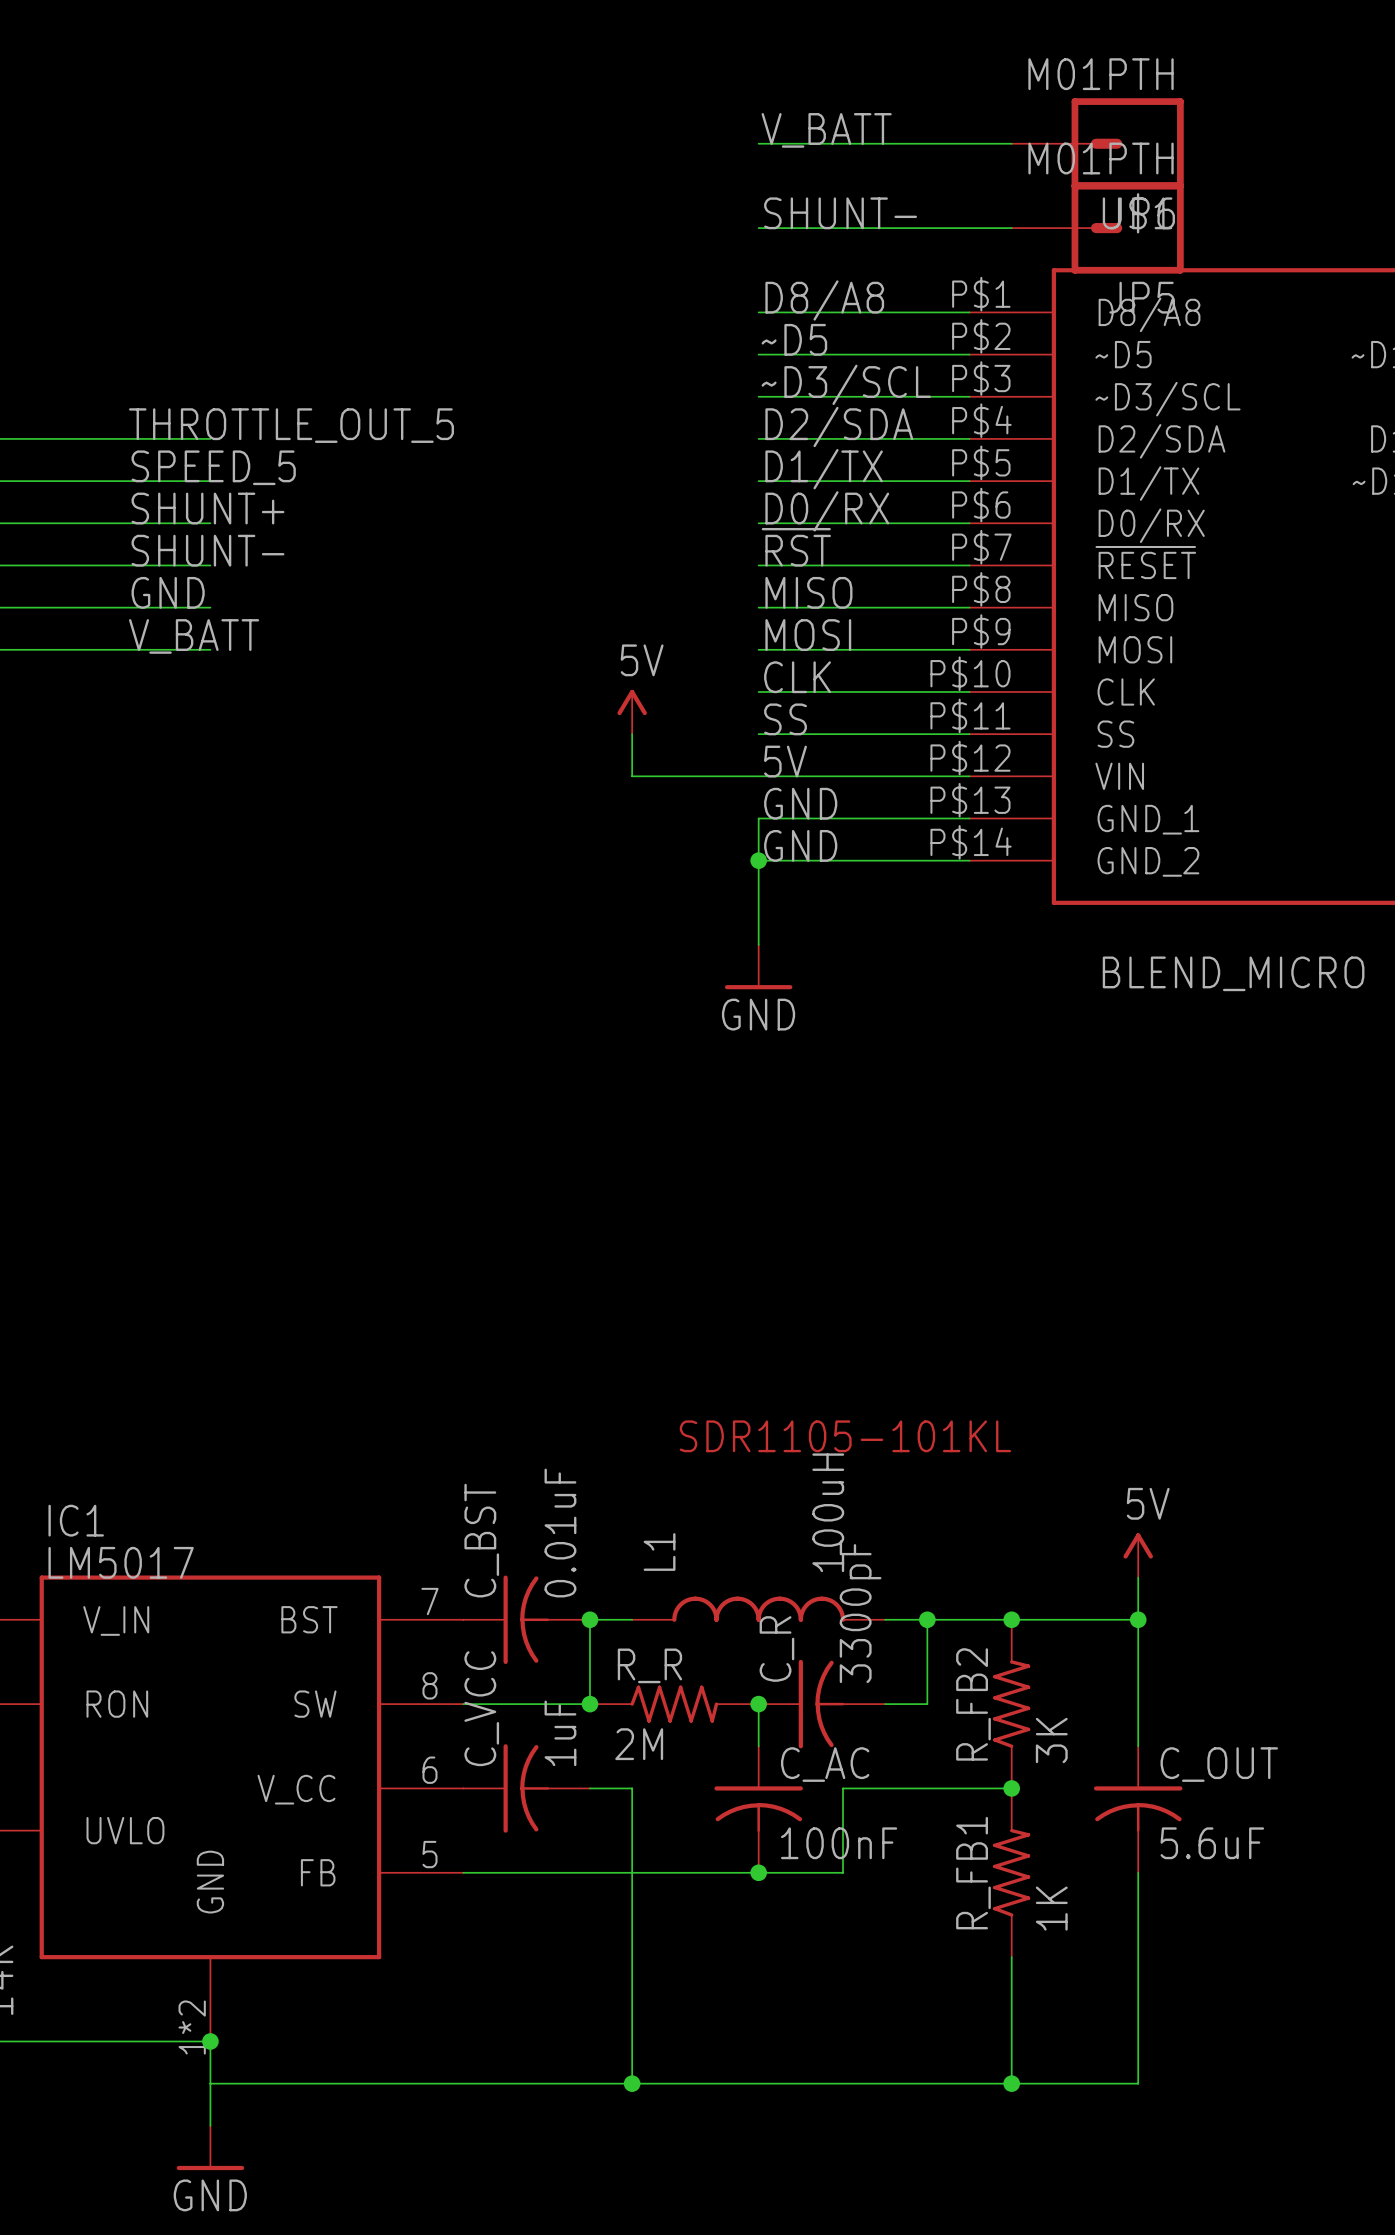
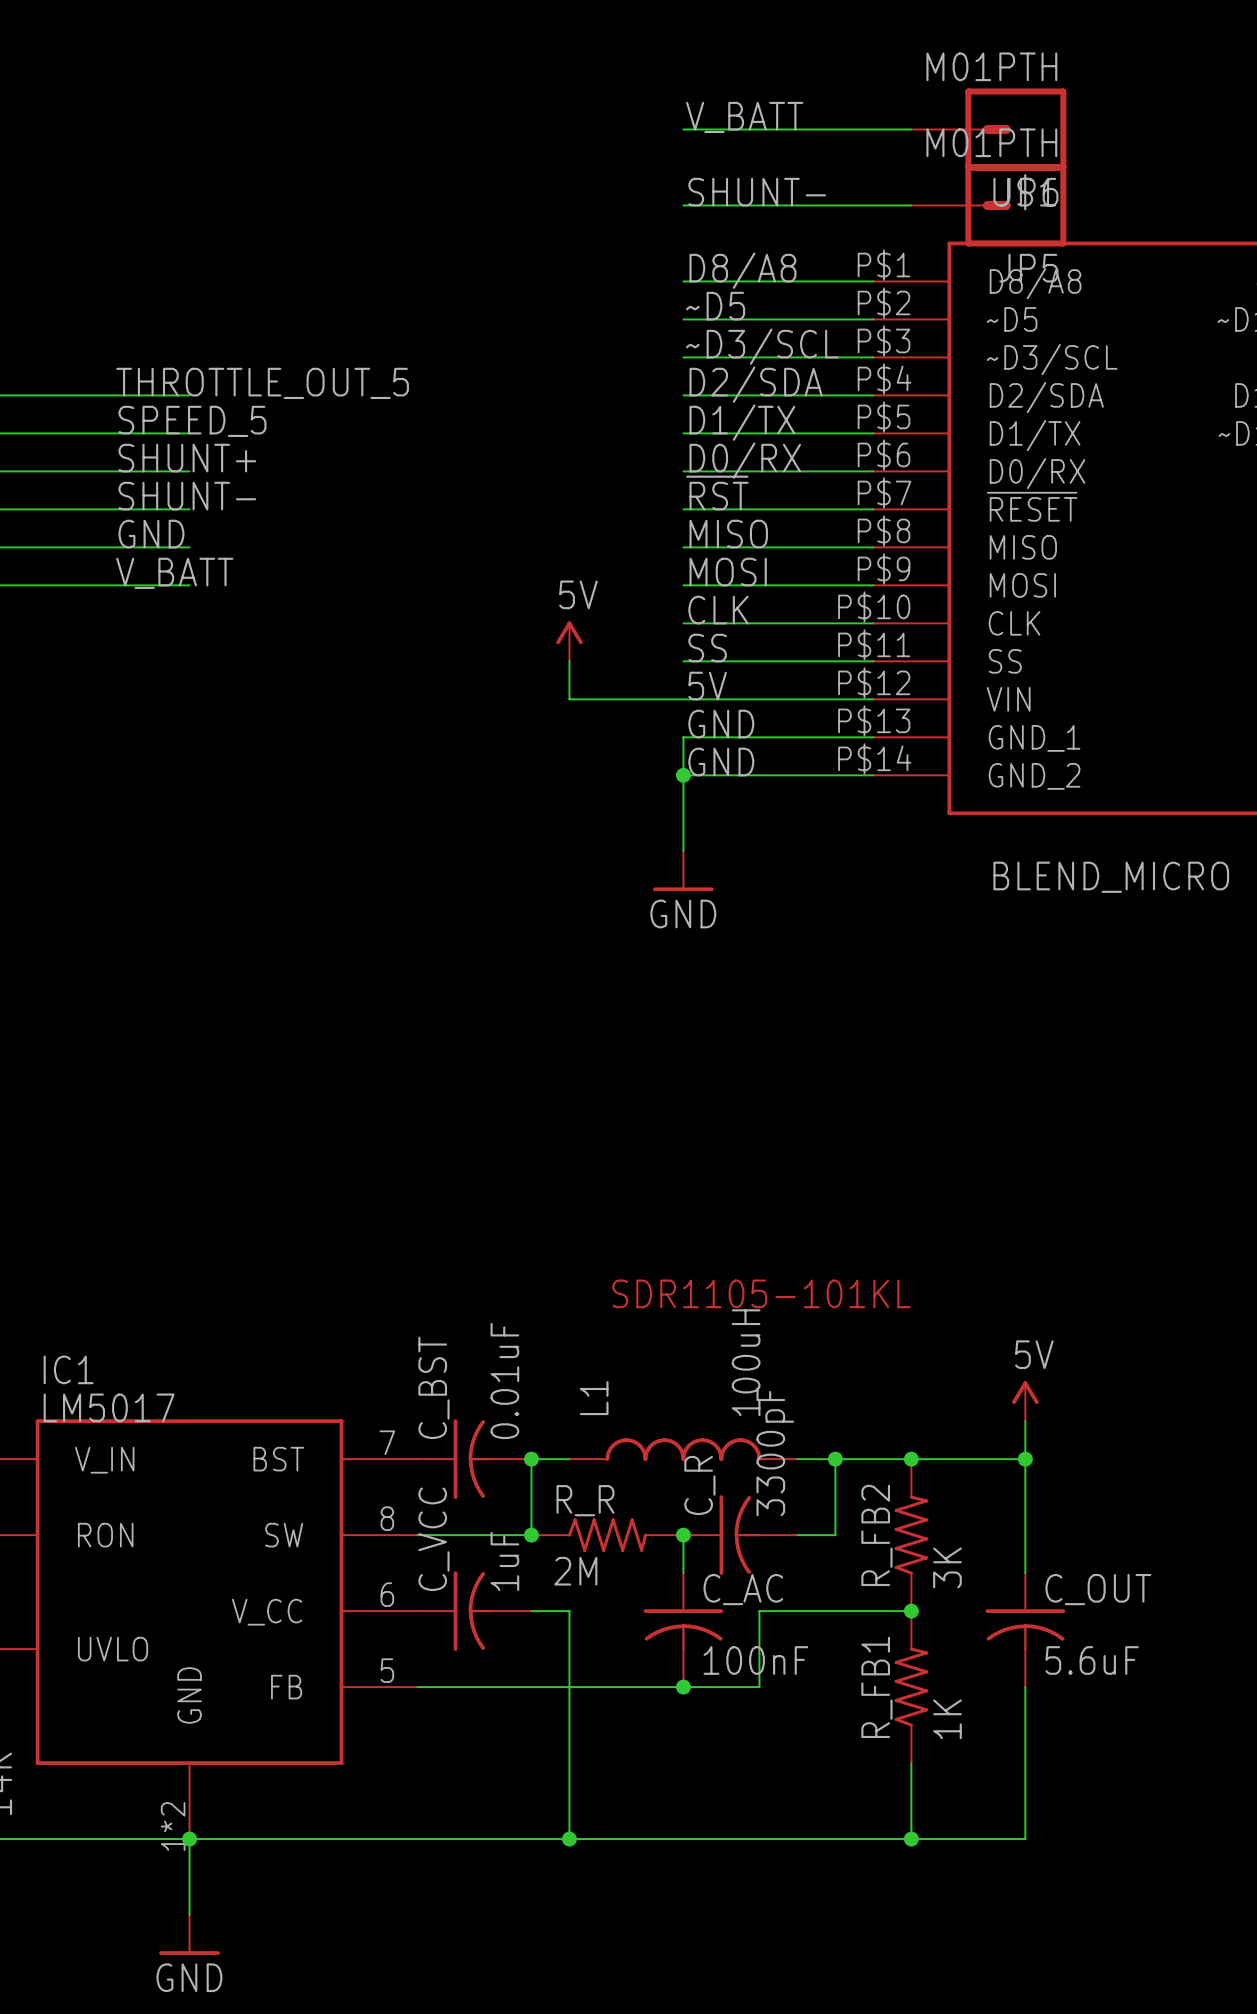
wire: (632, 2041) (632, 2083) -> none
wire: (1011, 2041) (1011, 2083) -> none
wire: (1138, 2041) (1138, 2083) (210, 2083) -> (1025, 1839) (189, 1839)
junction position: (632, 2083) -> (569, 1839)
junction position: (1011, 2083) -> (911, 1839)

